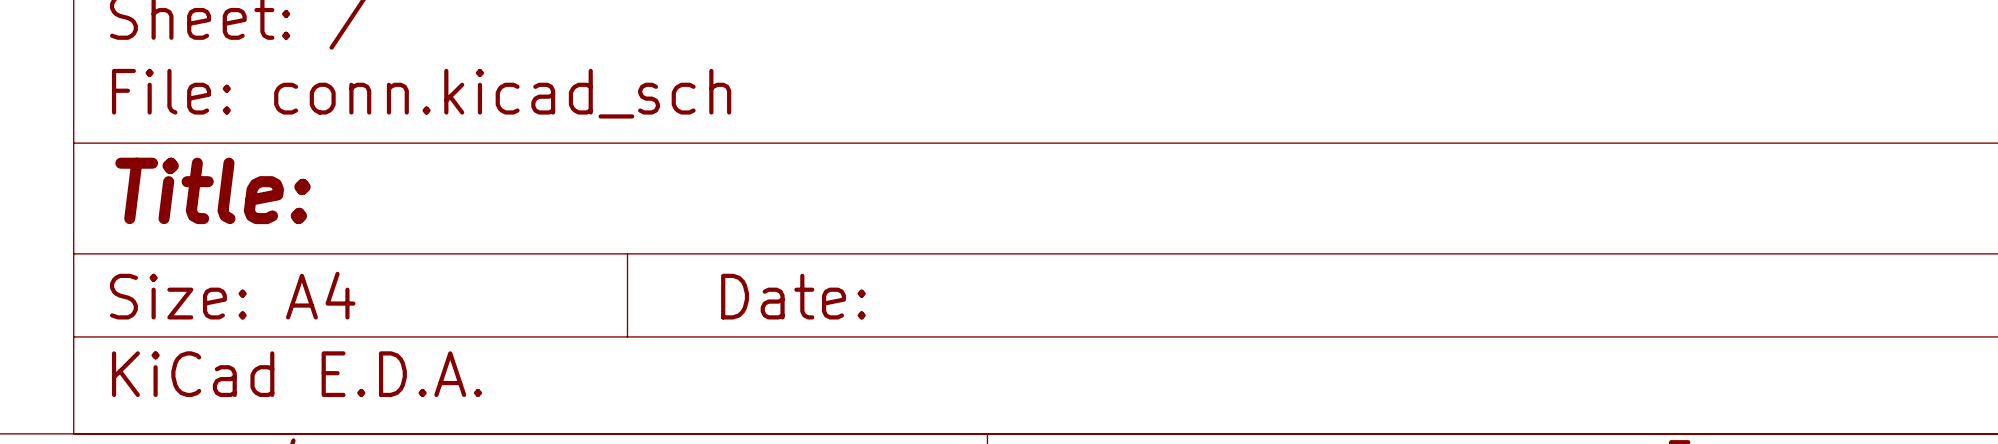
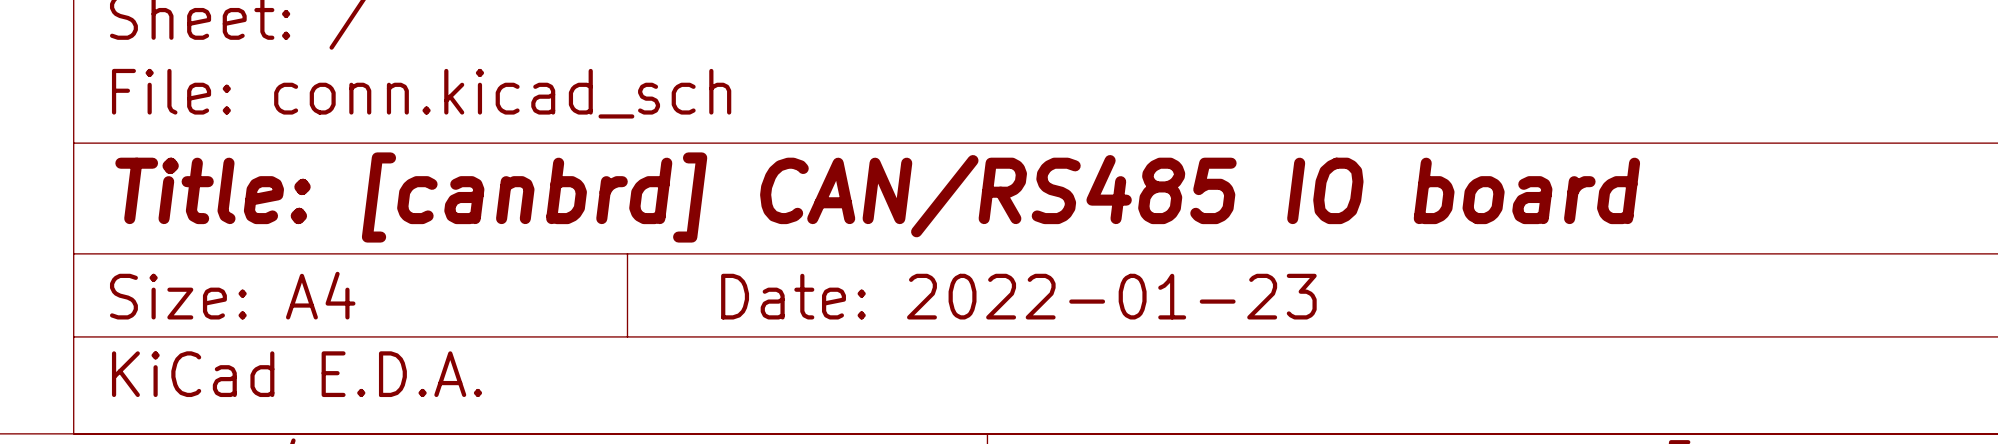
title block: Title: (213, 190) -> Title: [canbrd] CAN/RS485 IO board (877, 197)
title block: Date: (793, 296) -> Date: 2022-01-23 (1018, 296)

